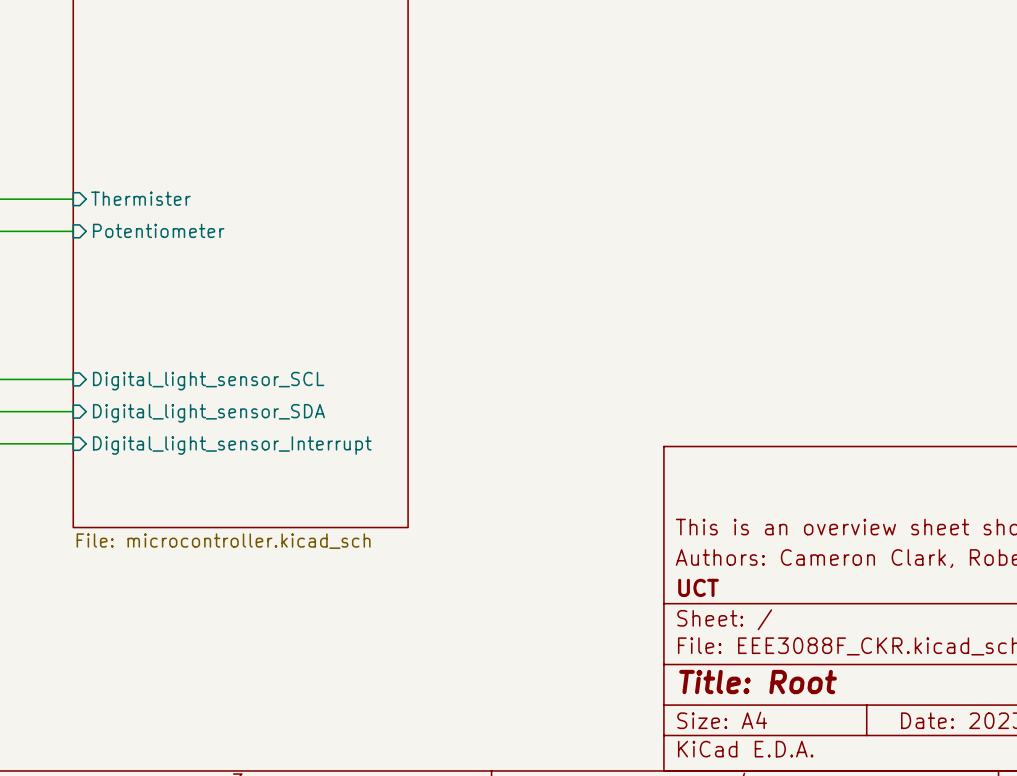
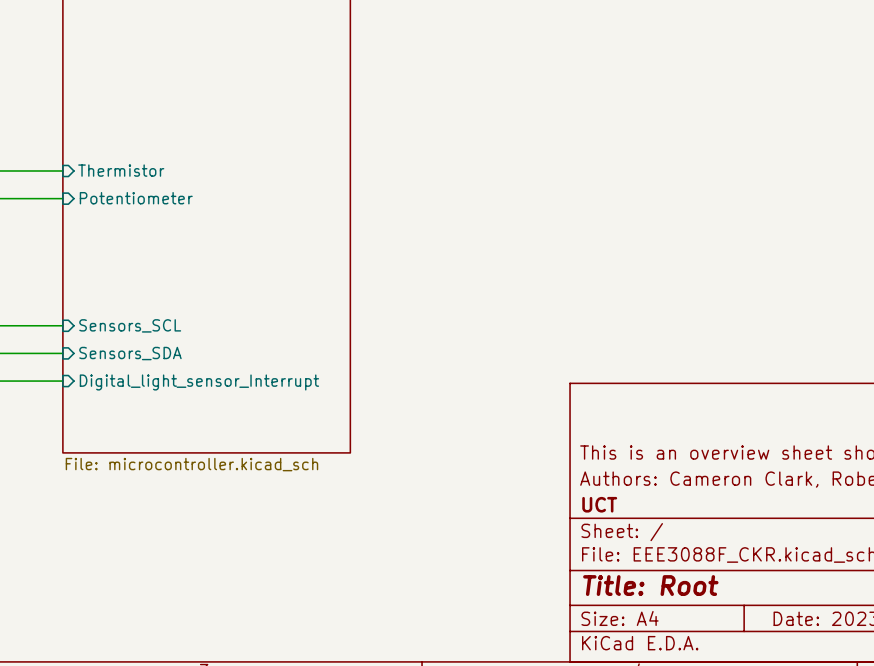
sheet pin: Thermister (140, 198) -> Thermistor (121, 170)
sheet pin: Digital_light_sensor_SCL (208, 381) -> Sensors_SCL (130, 325)
sheet pin: Digital_light_sensor_SDA (208, 413) -> Sensors_SDA (130, 353)

